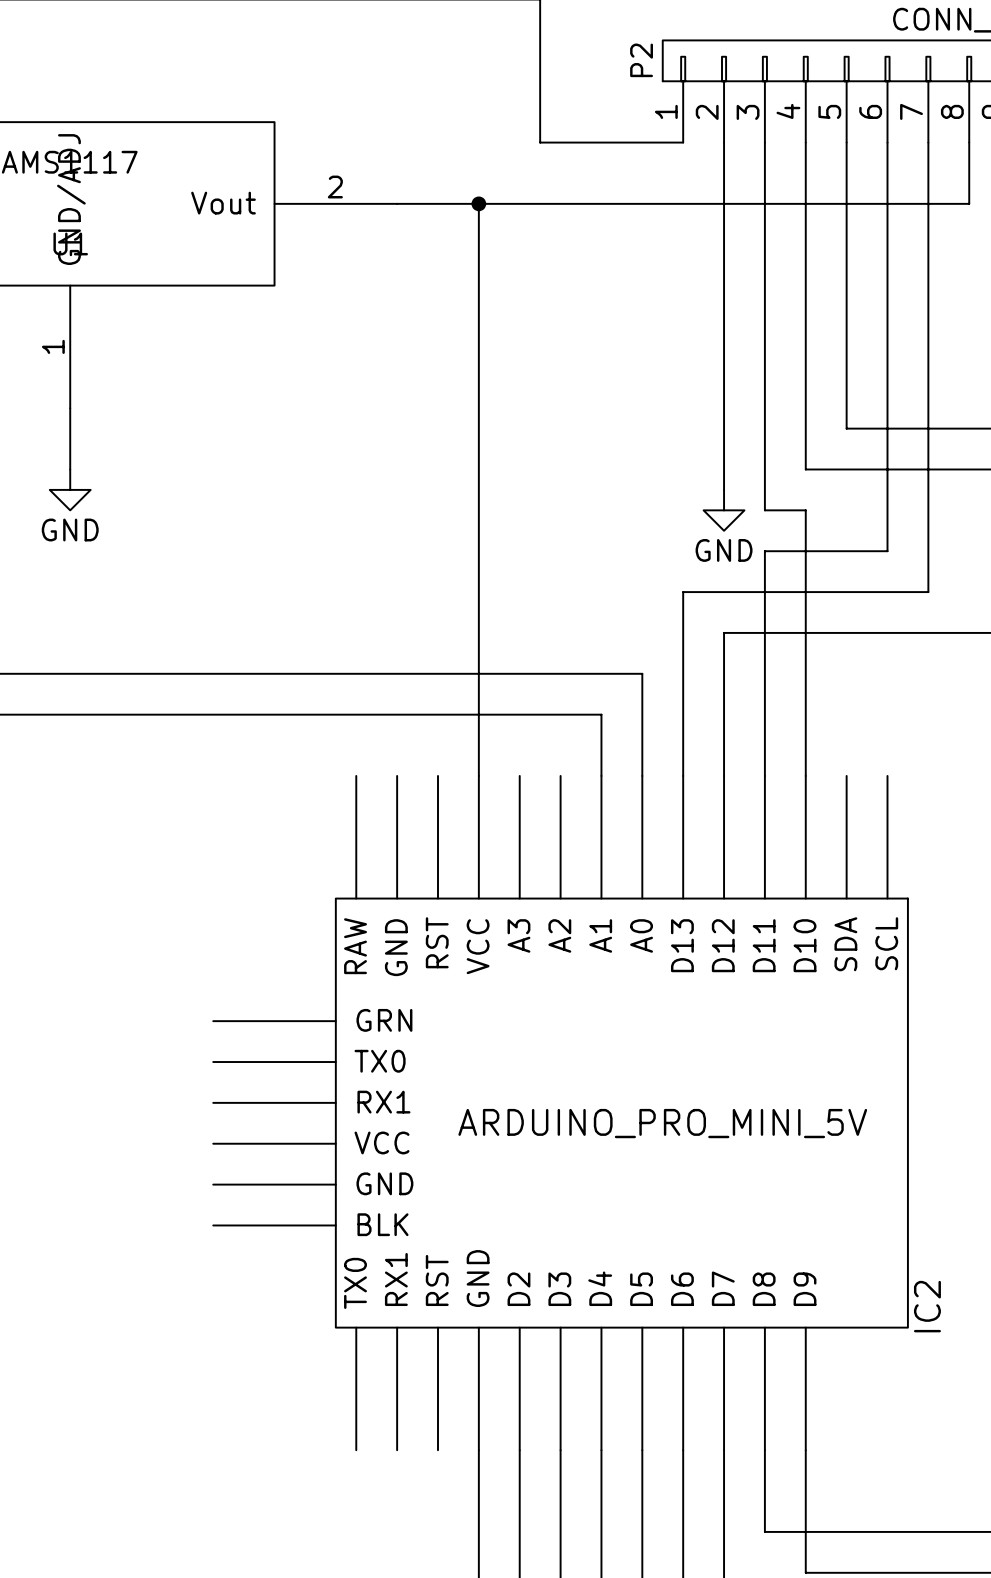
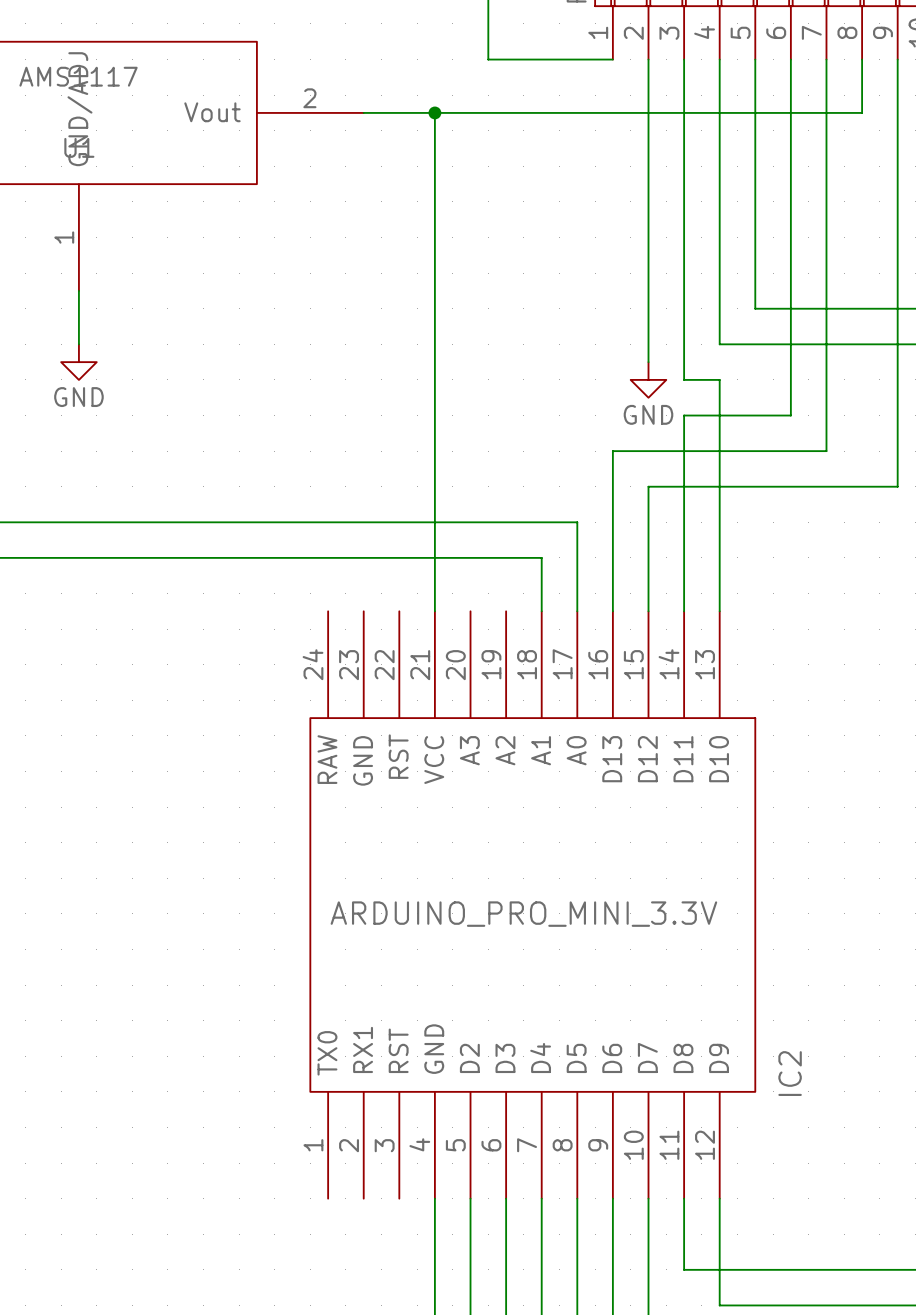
IC2 symbol: [213, 775, 908, 1451] -> [310, 611, 756, 1199]
IC2 value: ARDUINO_PRO_MINI_5V (662, 1123) -> ARDUINO_PRO_MINI_3.3V (523, 914)
IC2 name position: IC2 (927, 1306) -> IC2 (790, 1073)

